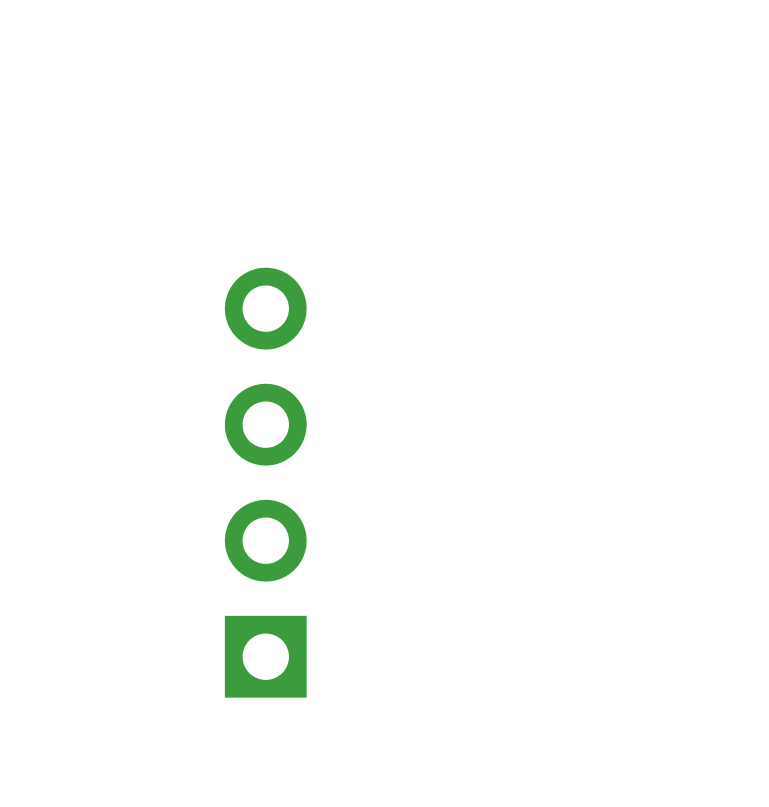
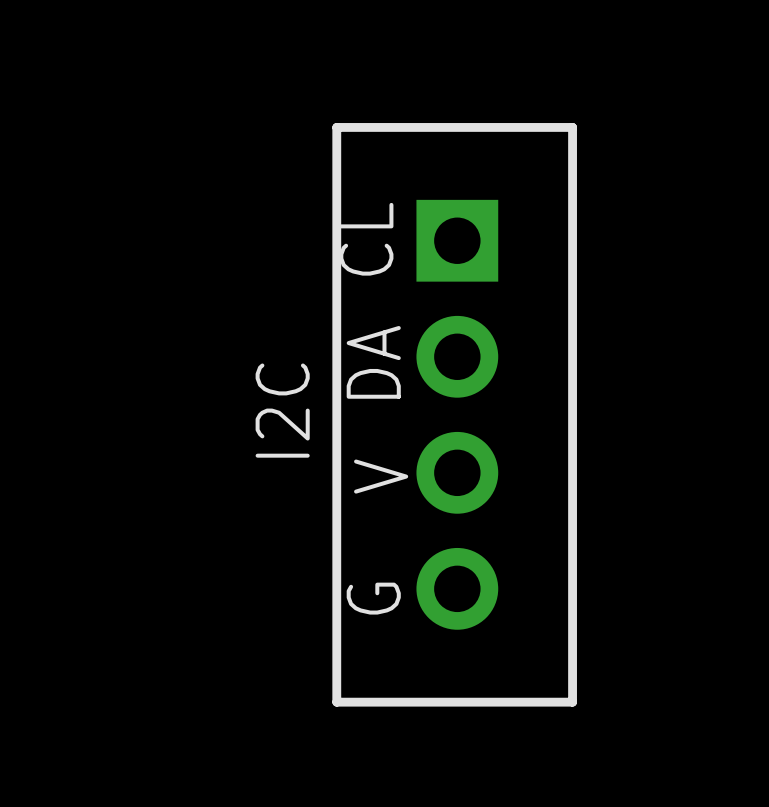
line: none -> (572, 127) (336, 127) (336, 702) (572, 702) (572, 127)
text: none -> CL (366, 239)
text: none -> DA (373, 362)
text: none -> I2C (282, 410)
text: none -> V (381, 476)
part rotation: 0° (265, 482) -> 180° (457, 414)
text: none -> G (373, 598)

